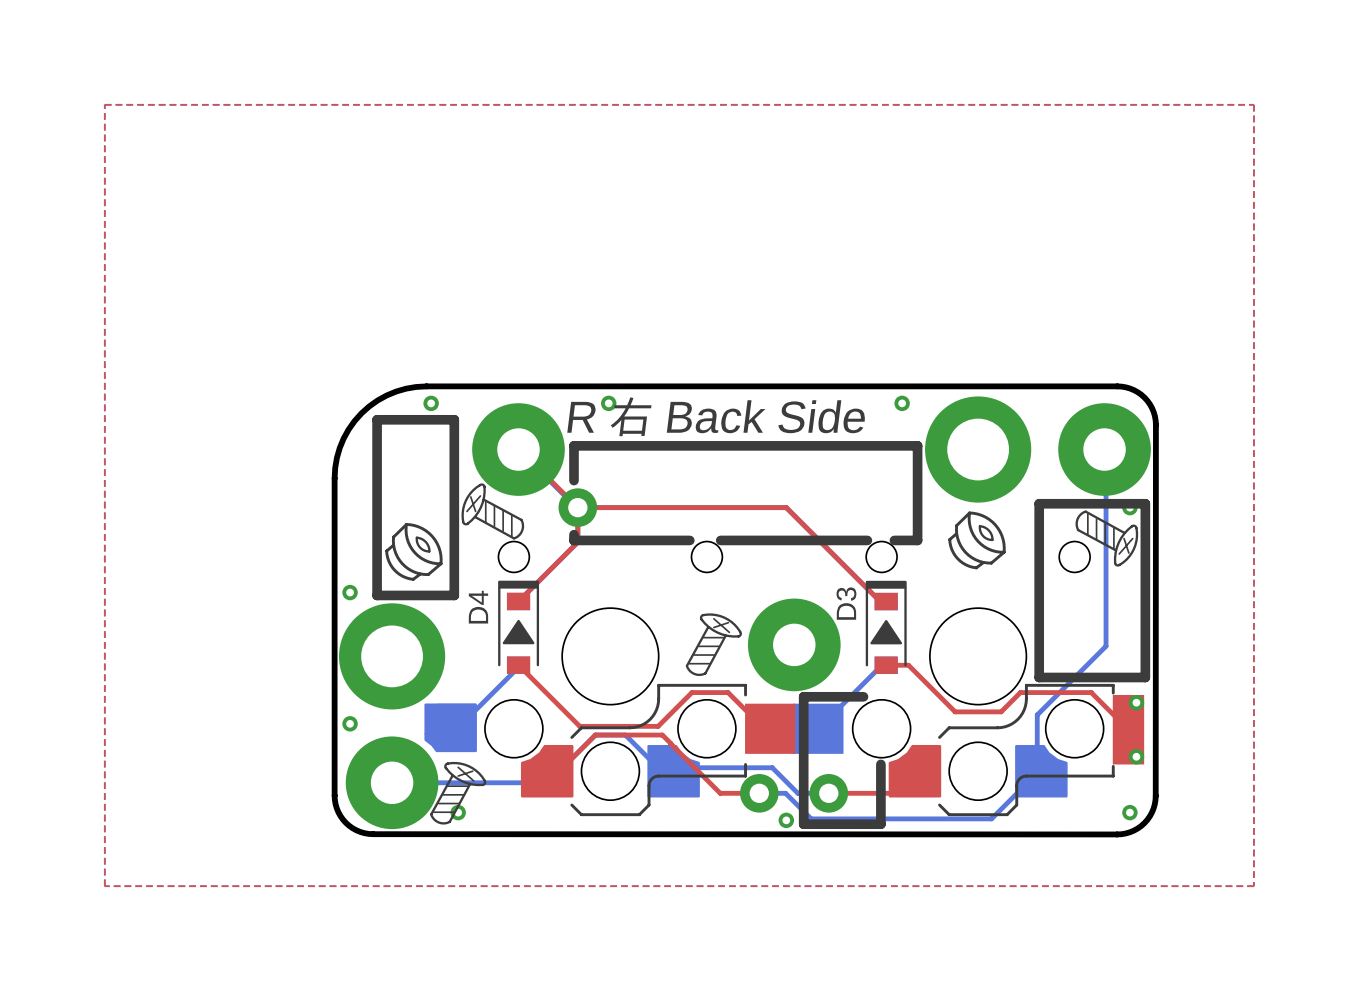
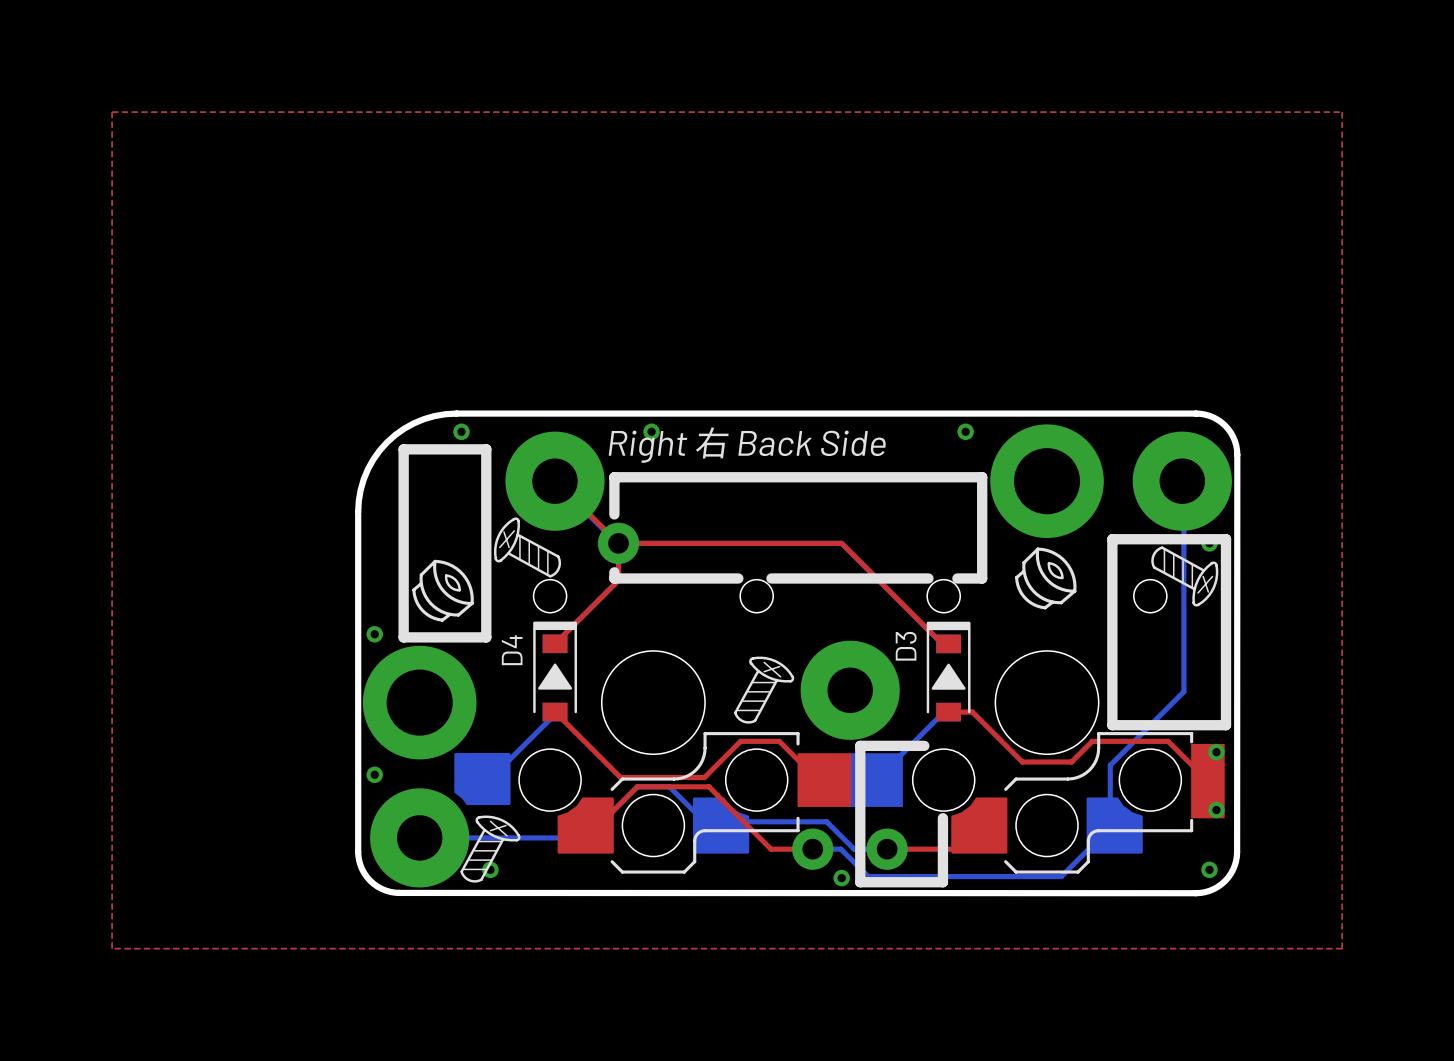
text: R 右 Back Side (716, 416) -> Right 右 Back Side (747, 445)

